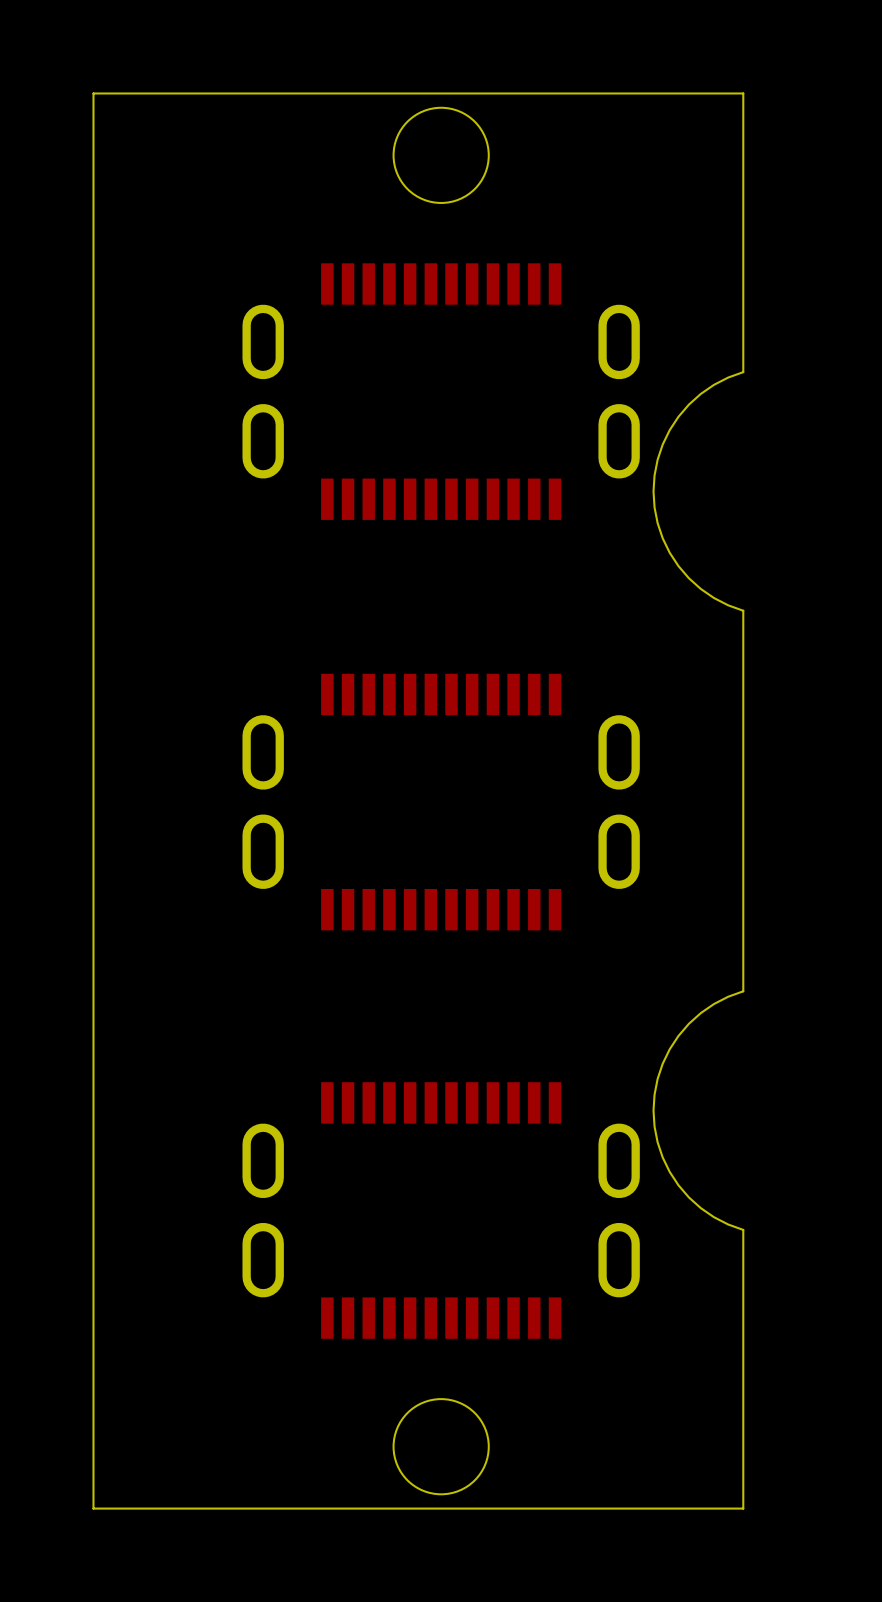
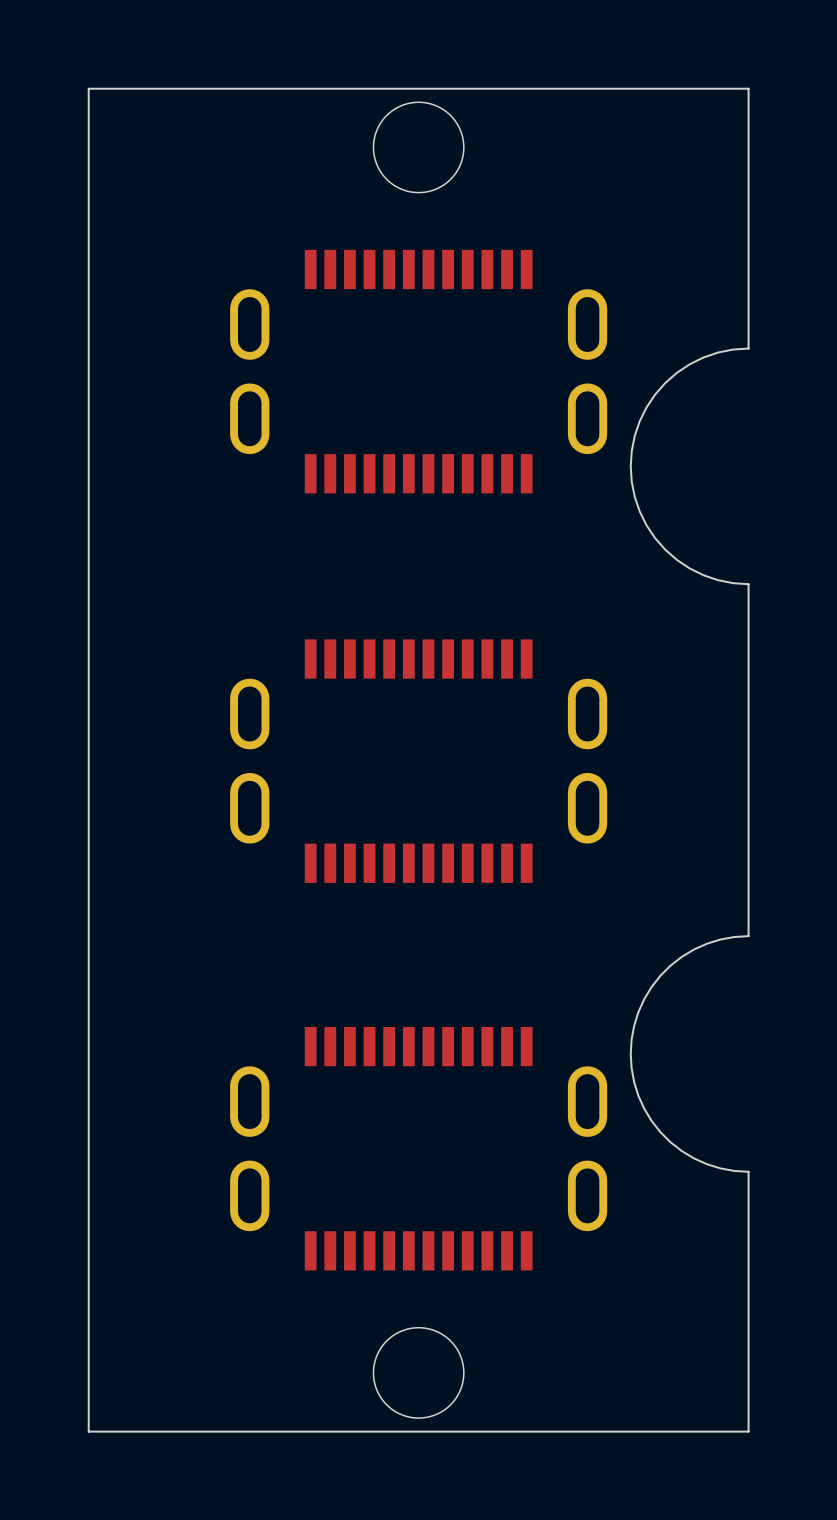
board edge: (743, 93) (743, 372) (713, 384) (700, 393) (678, 416) (662, 444) (654, 475) (653, 491) (657, 523) (662, 538) (678, 566) (688, 578) (713, 598) (743, 610) (743, 991) (713, 1004) (700, 1013) (678, 1035) (669, 1049) (657, 1078) (653, 1110) (657, 1142) (669, 1171) (678, 1185) (688, 1197) (713, 1217) (743, 1229) (743, 1508) -> (705, 88) (748, 88) (748, 348) (718, 352) (703, 357) (689, 364) (665, 383) (646, 407) (639, 421) (631, 450) (630, 466) (631, 481) (639, 511) (646, 525) (665, 549) (689, 568) (703, 575) (718, 580) (748, 584) (748, 936) (734, 936) (706, 943) (693, 949) (670, 965) (651, 987) (638, 1012) (634, 1025) (630, 1053) (634, 1082) (638, 1095) (651, 1120) (670, 1142) (681, 1150) (706, 1164) (734, 1170) (748, 1171) (748, 1431) (705, 1431)

